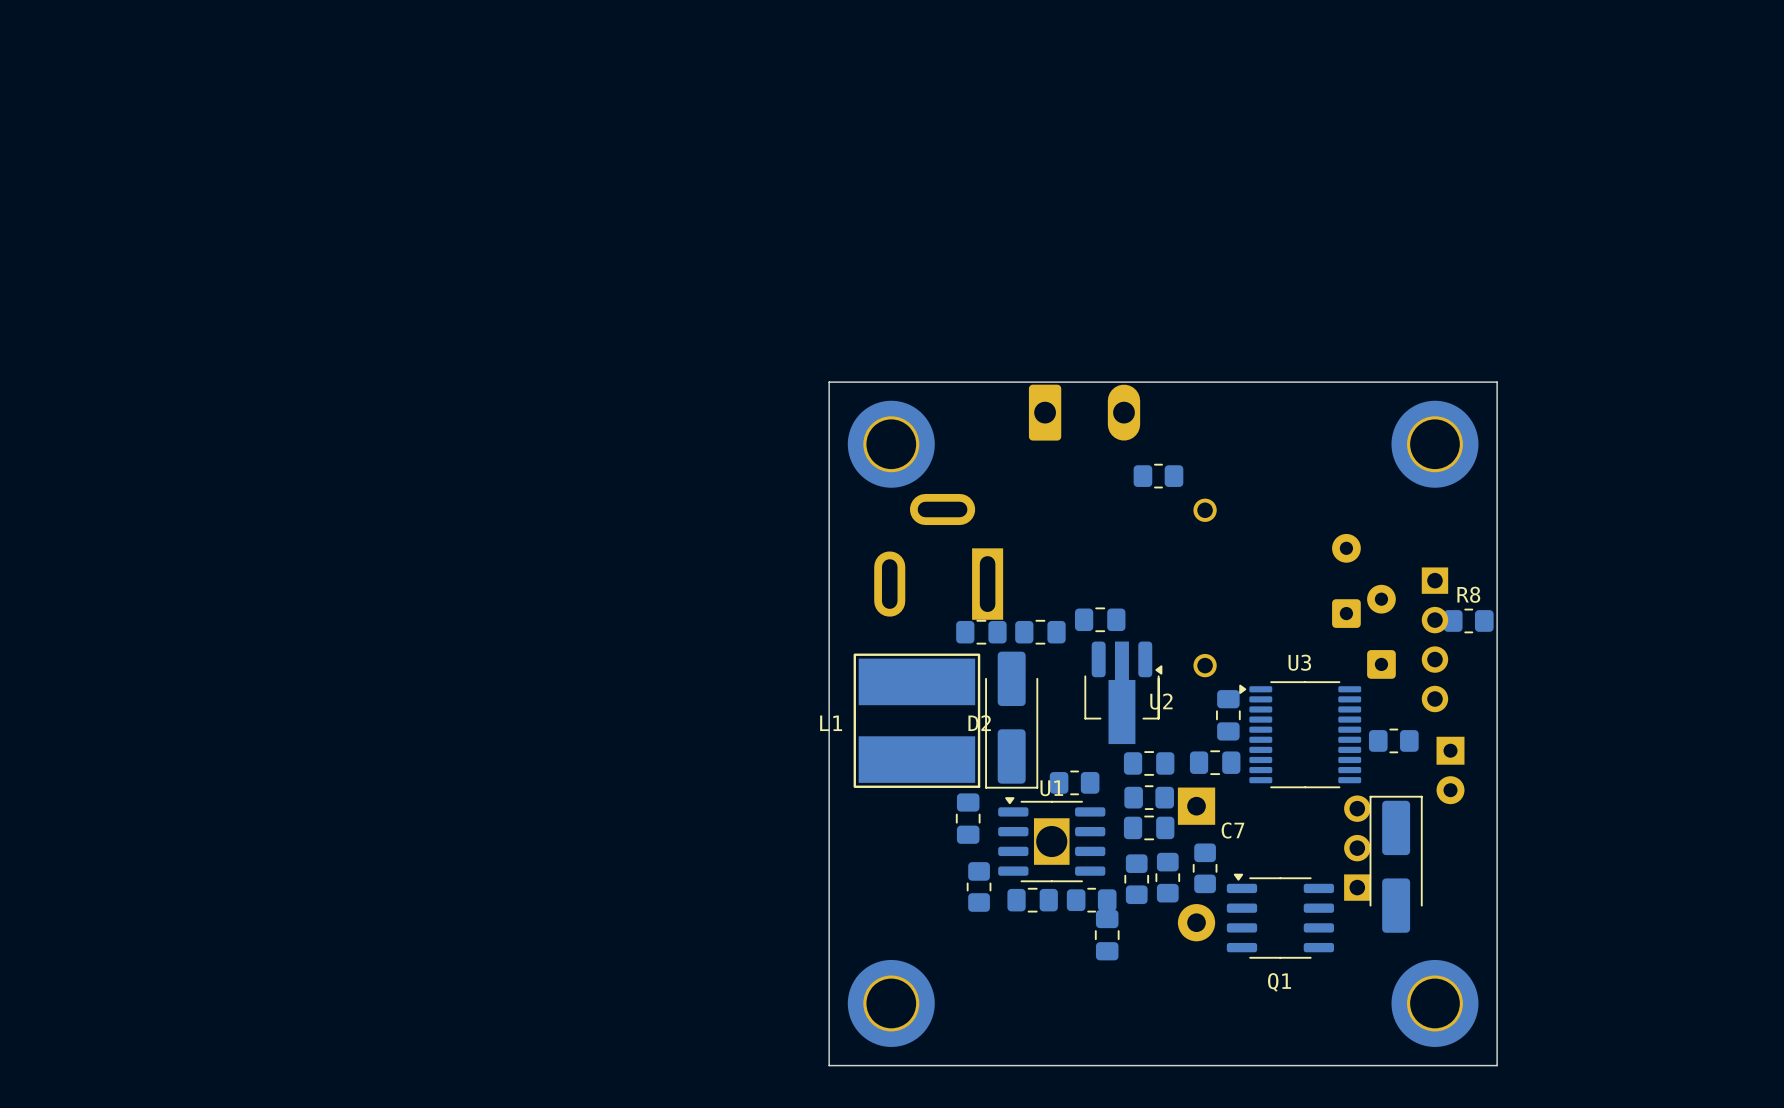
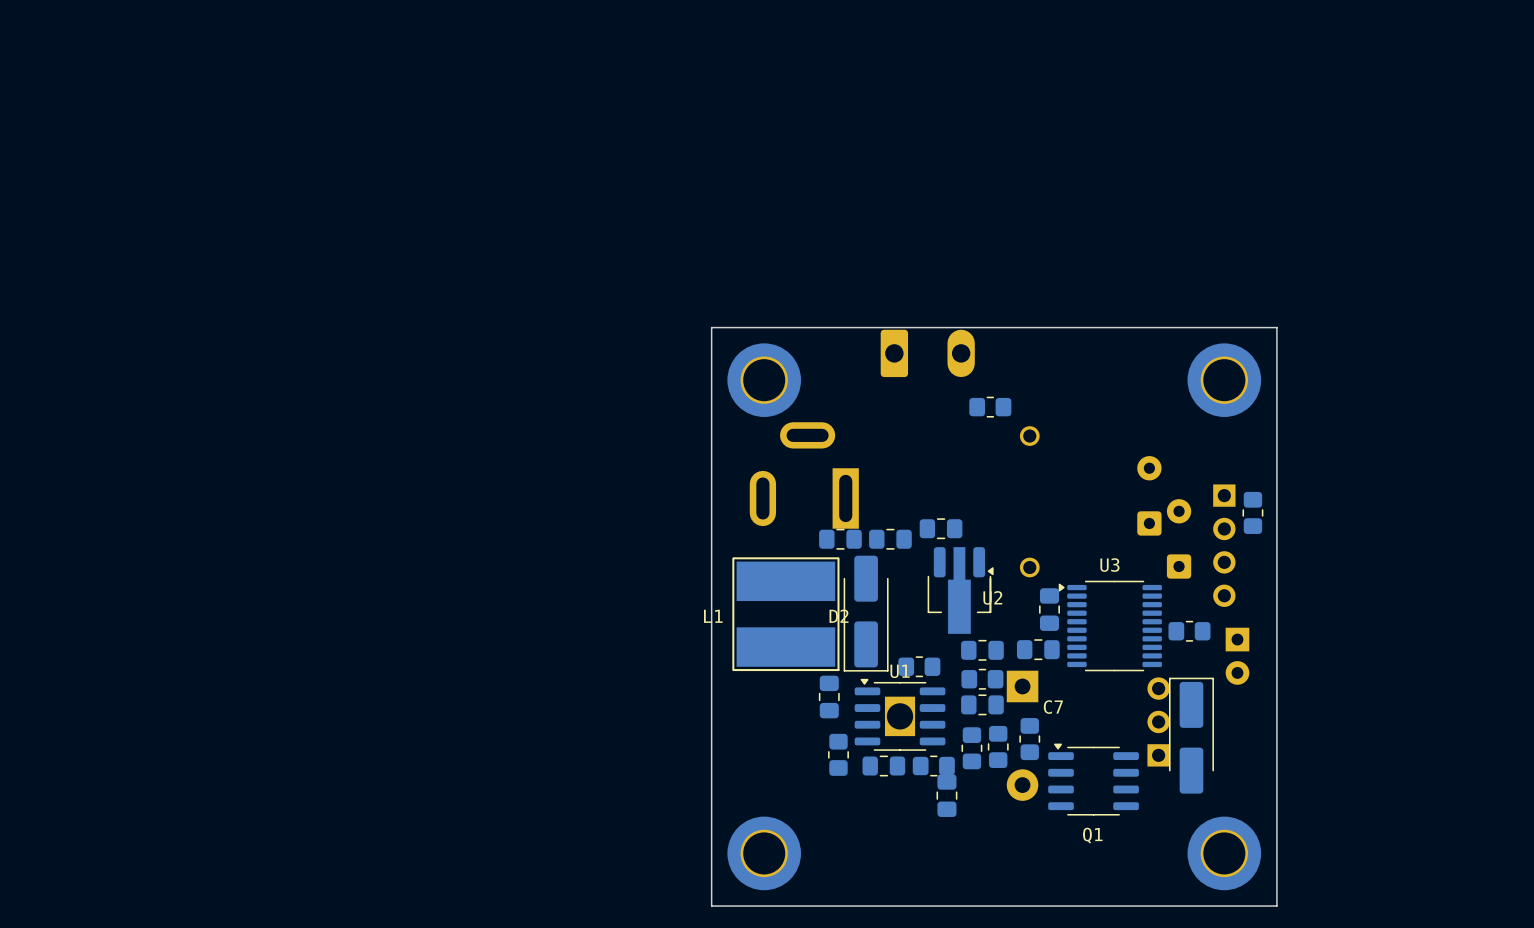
part: none -> (1252, 512)
R8: (1468, 620) -> none

